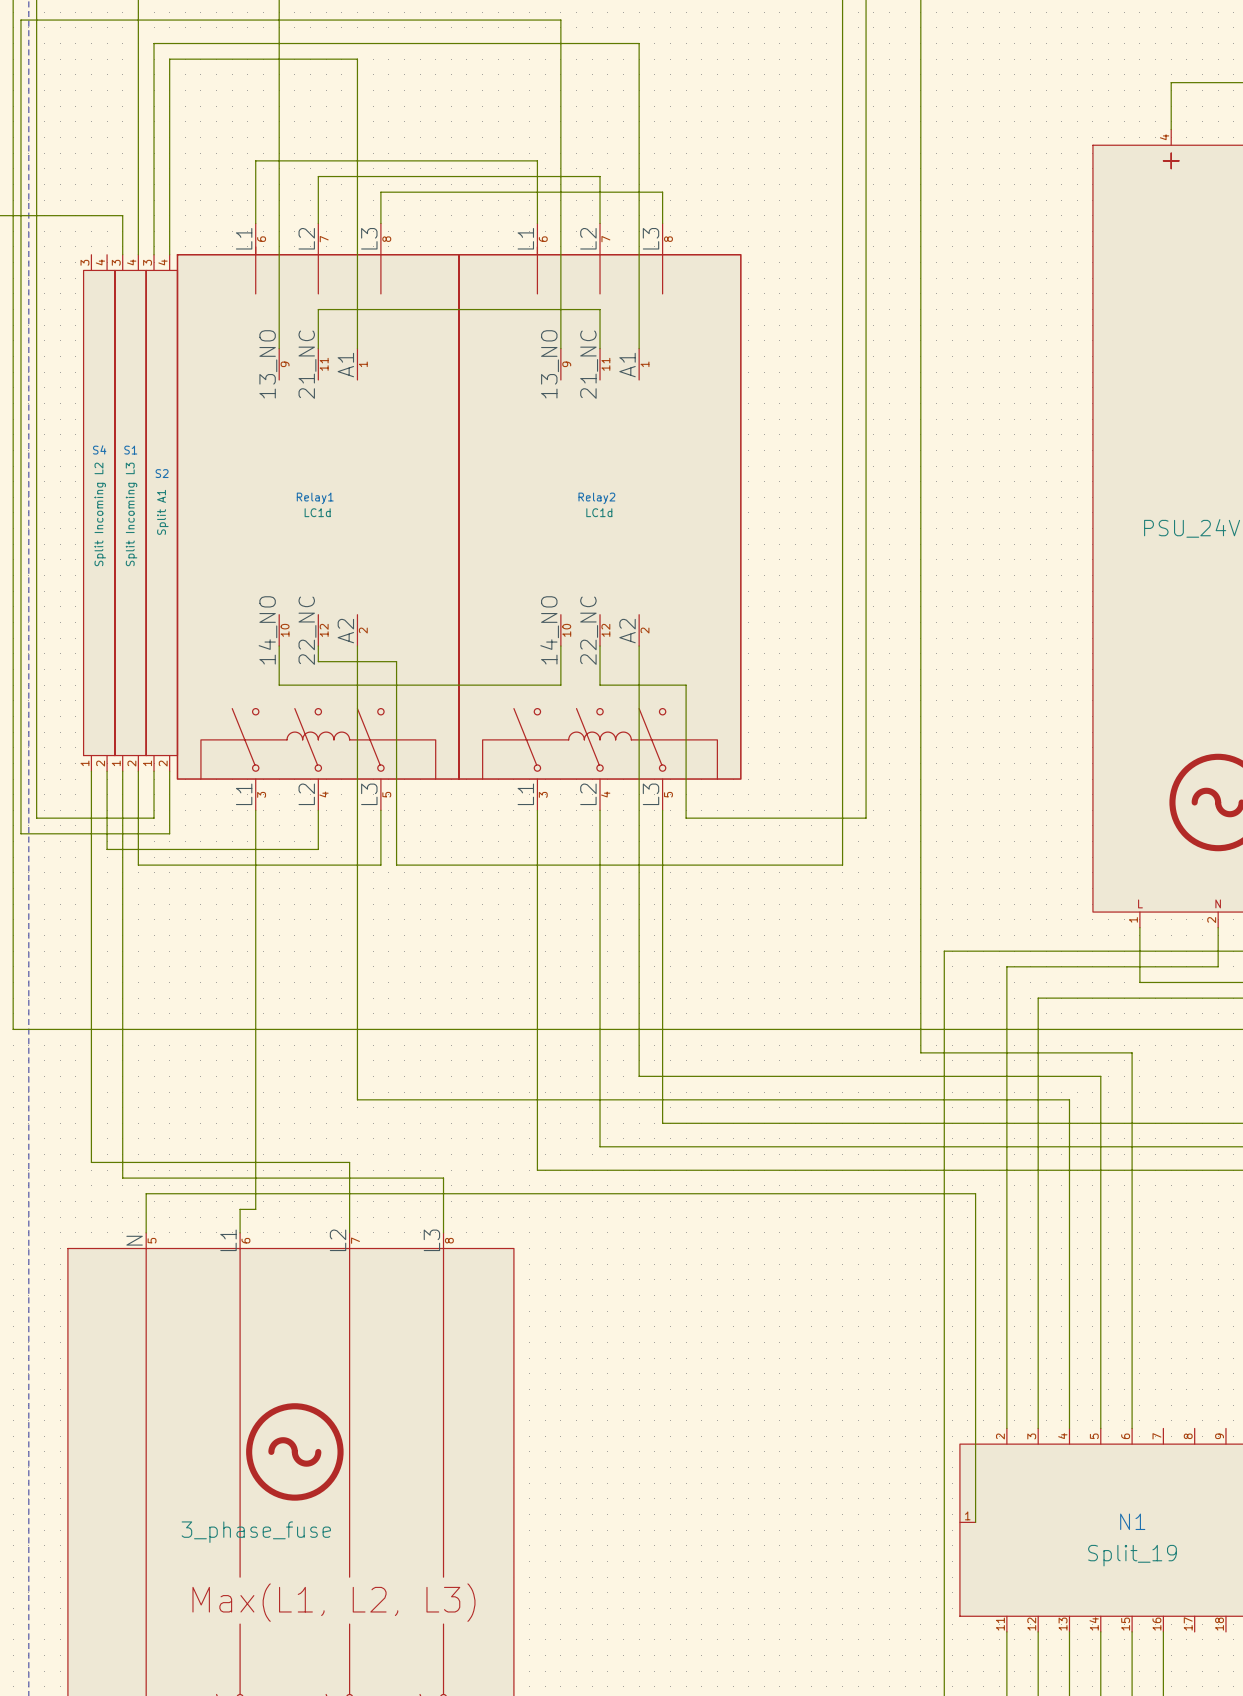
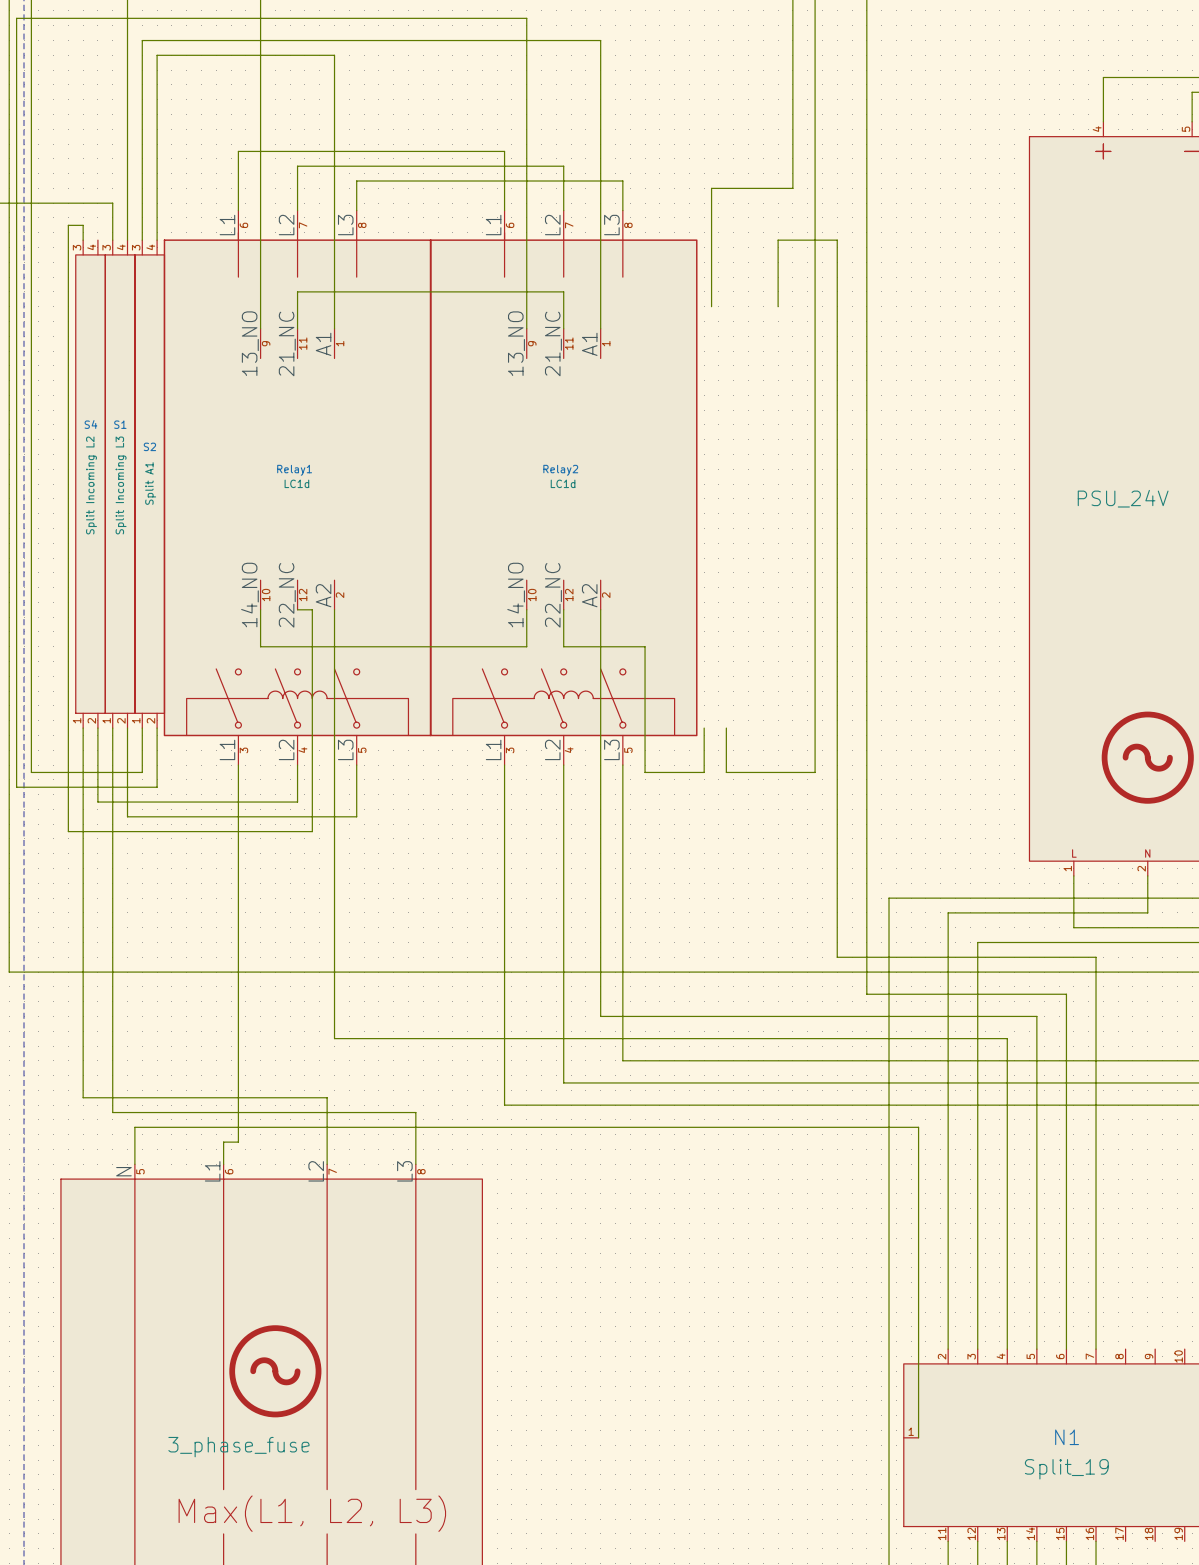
wire: (842, 200) (842, 865) (396, 865) (396, 661) (318, 661) (318, 646) -> (792, 188) (711, 188) (711, 306)
wire: none -> (83, 240) (83, 225) (68, 225) (68, 831) (312, 831) (312, 609) (297, 609)
wire: none -> (778, 306) (778, 240) (837, 240) (837, 957) (1096, 957) (1096, 1349)
wire: none -> (726, 728) (726, 772)
wire: (748, 818) (772, 818) -> (704, 772) (704, 728)

